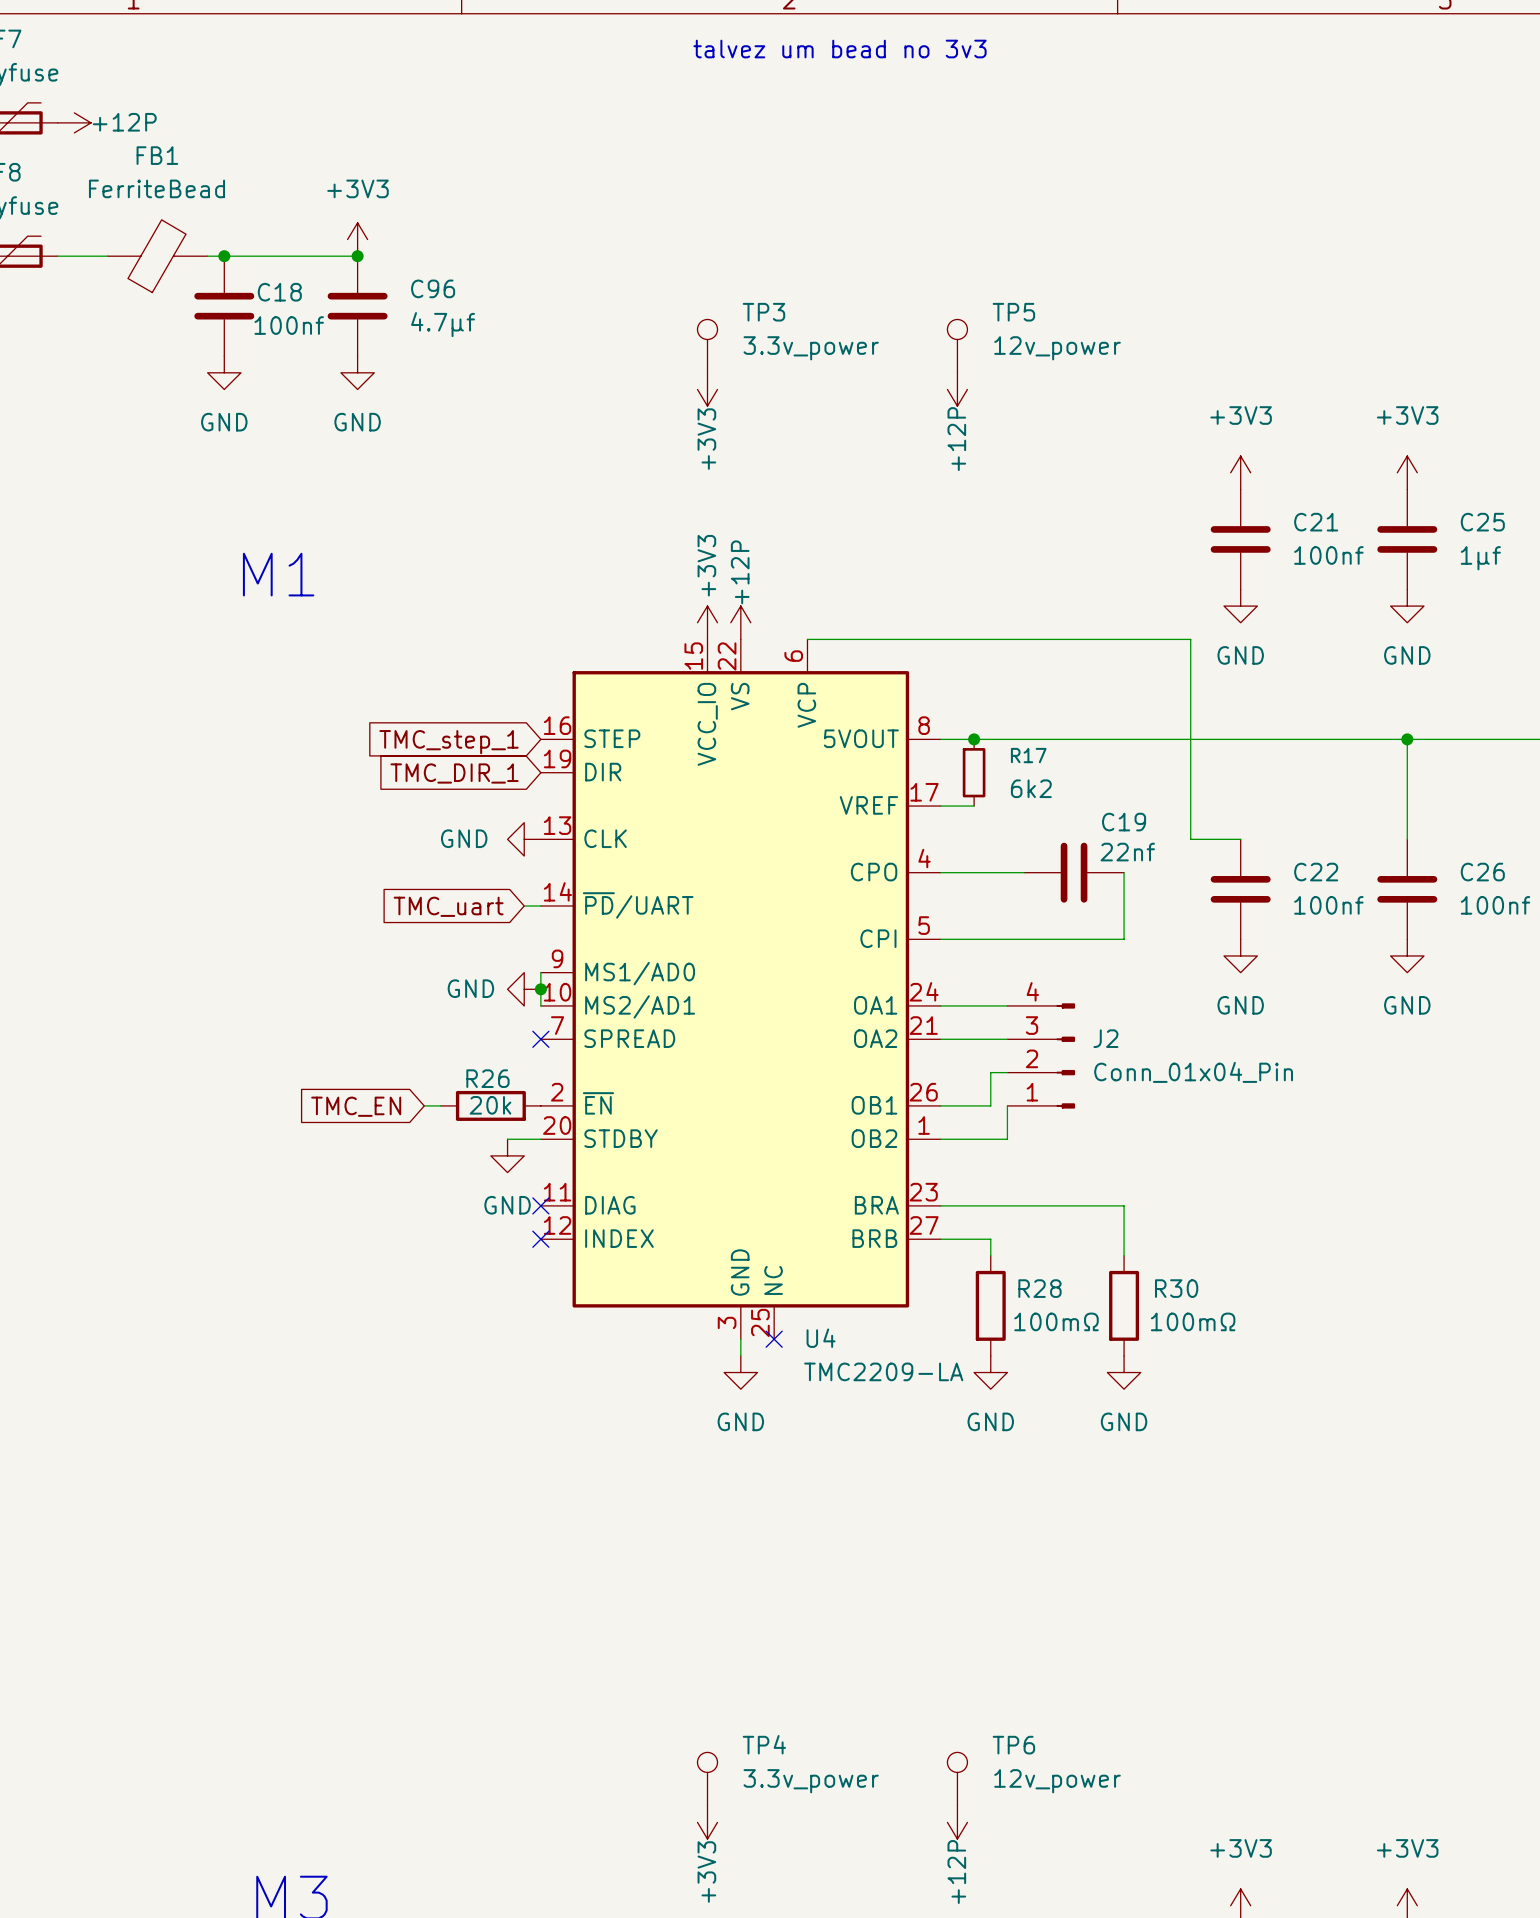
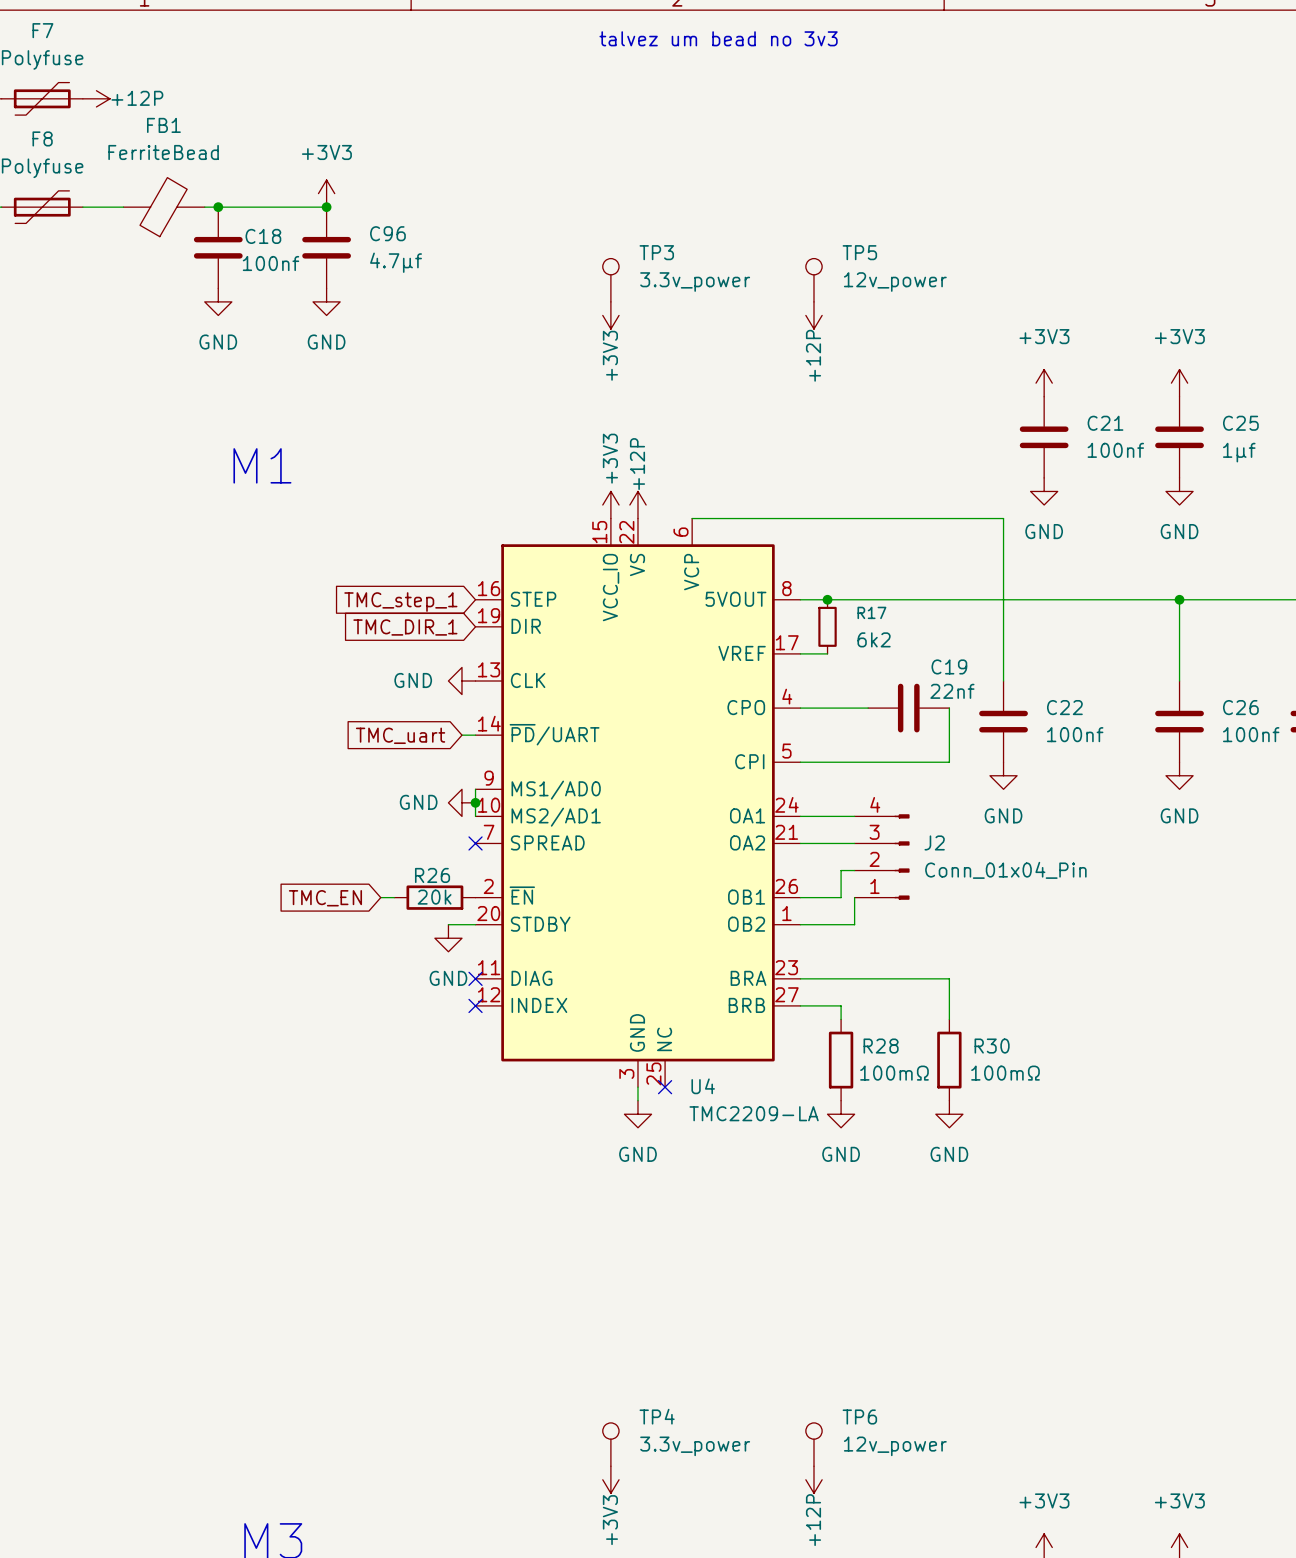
wire: (1190, 839) (1240, 839) -> none
C22 position: (1240, 889) -> (1003, 721)
power symbol position: GND (1240, 955) -> GND (1003, 775)

